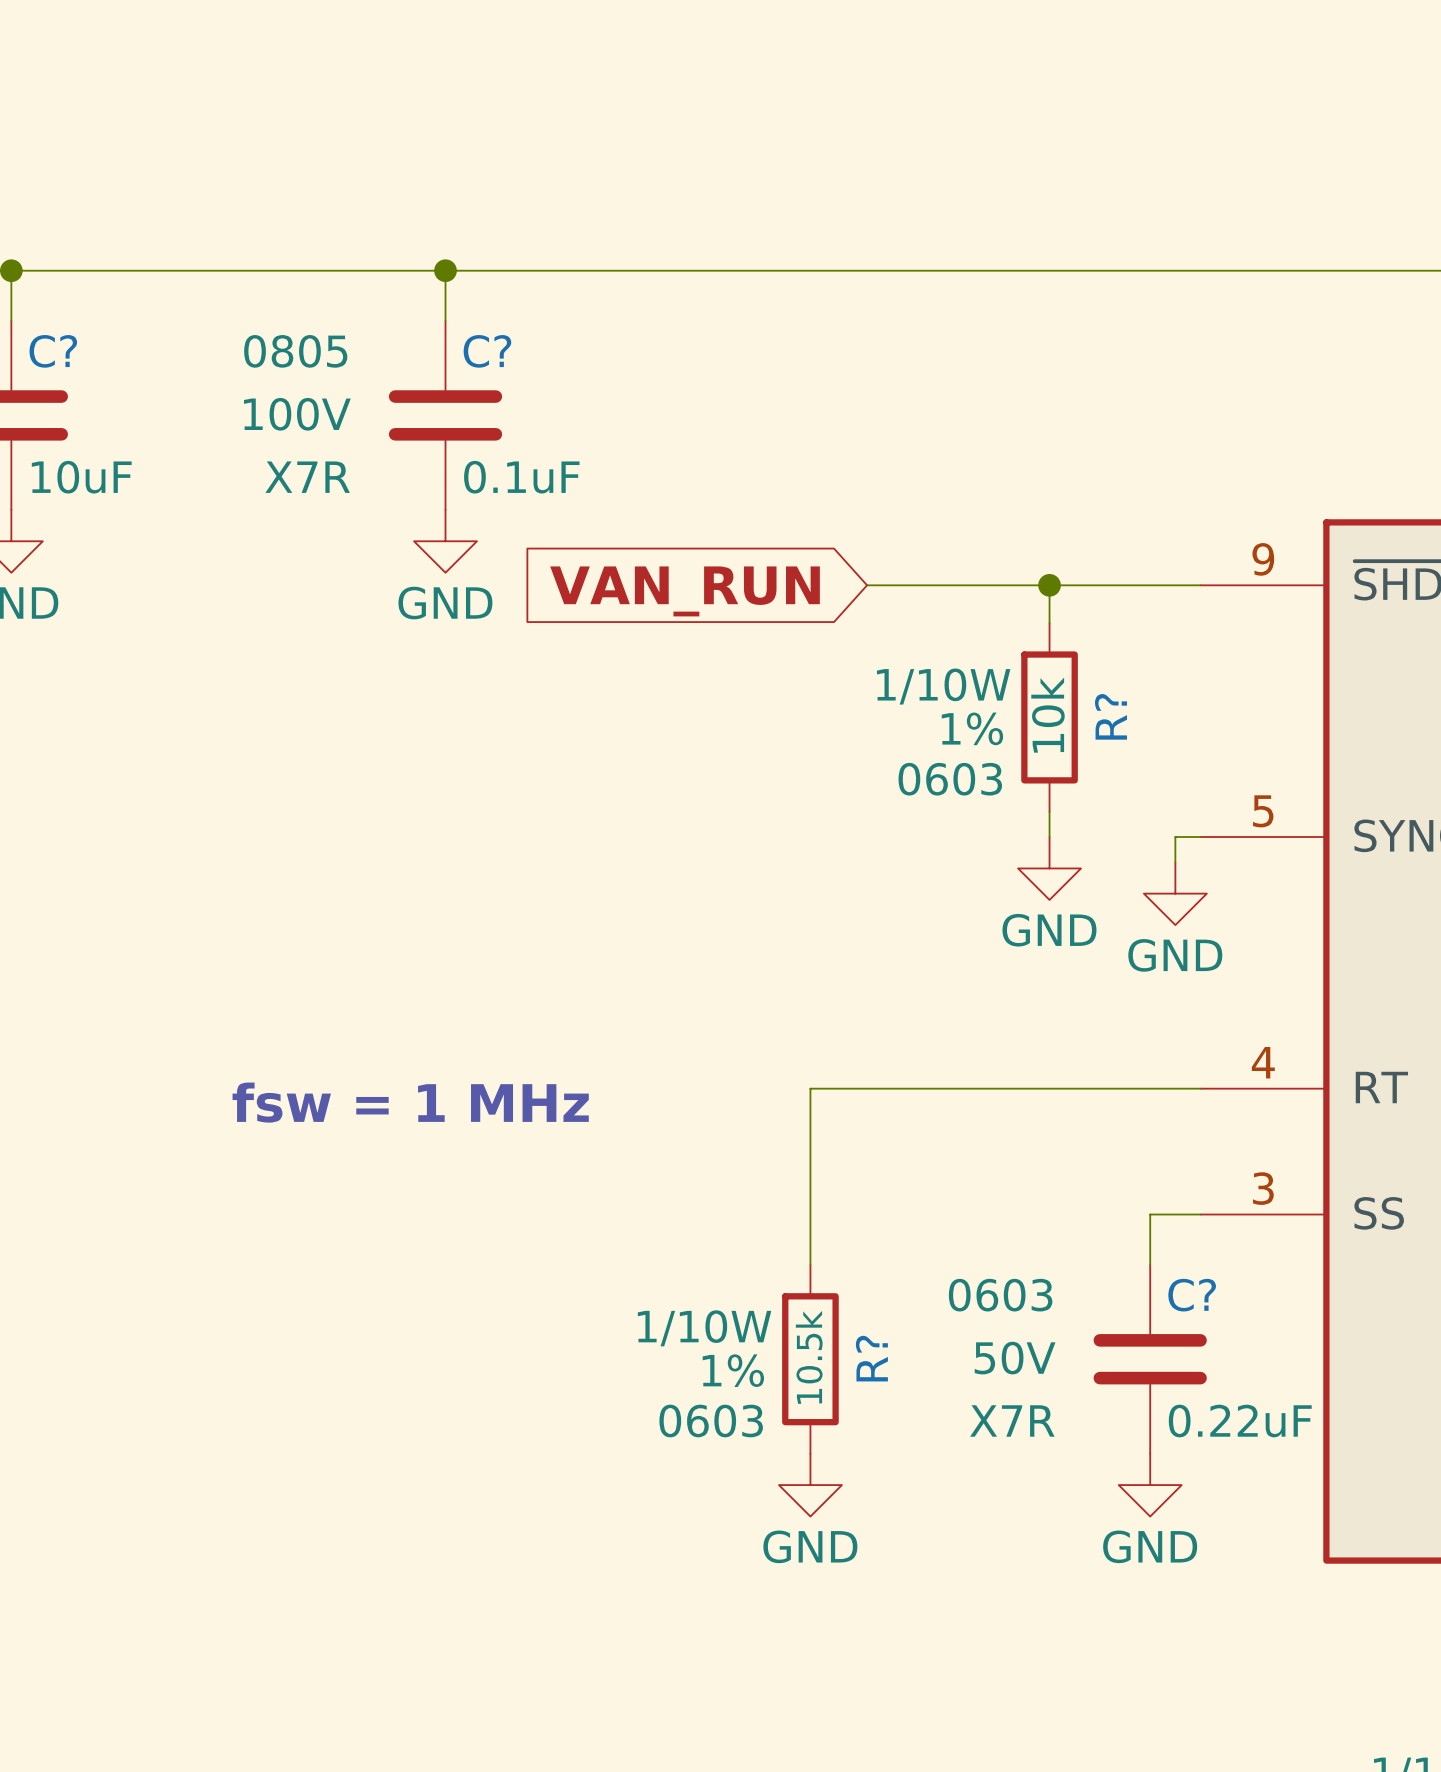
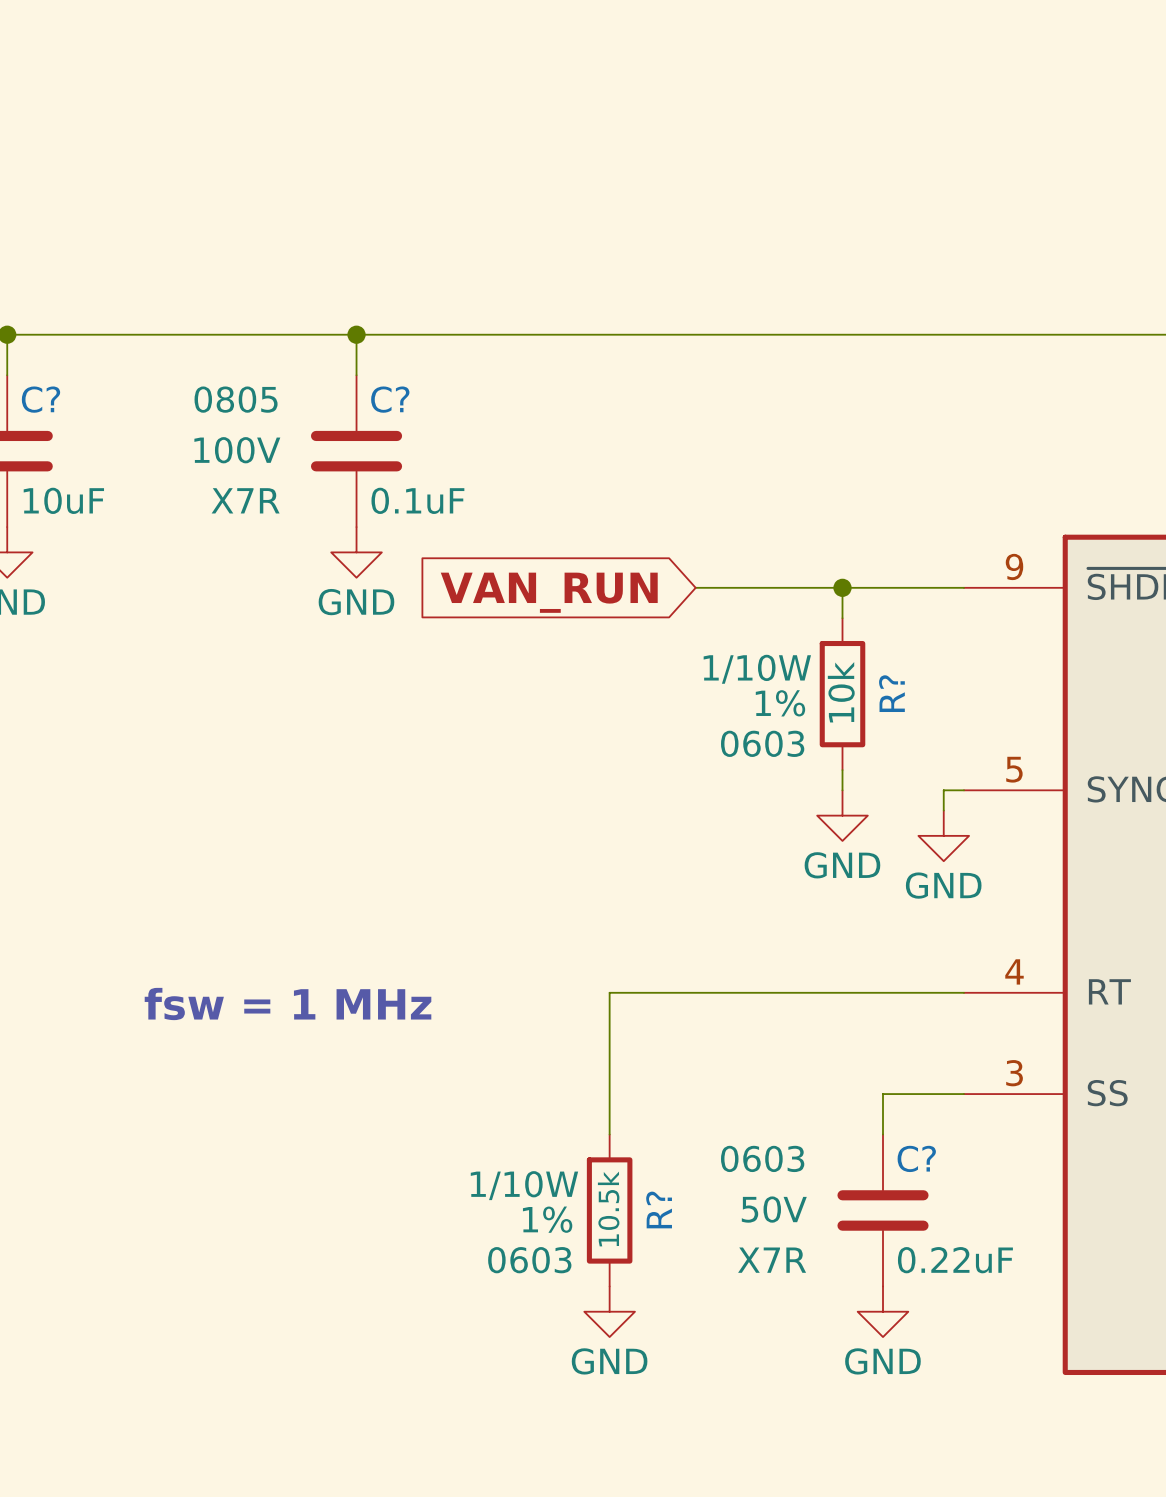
wire: (810, 1088) (810, 1264) -> (650, 992) (609, 992) (609, 1134)
text position: fsw = 1 MHz (410, 1102) -> fsw = 1 MHz (288, 1004)
wire: (1150, 1214) (1150, 1264) -> (923, 1094) (883, 1094) (883, 1134)
R? position: (810, 1359) -> (609, 1210)
C? position: (1150, 1359) -> (883, 1210)
power symbol position: GND (810, 1485) -> GND (609, 1311)
power symbol position: GND (1150, 1485) -> GND (883, 1311)

